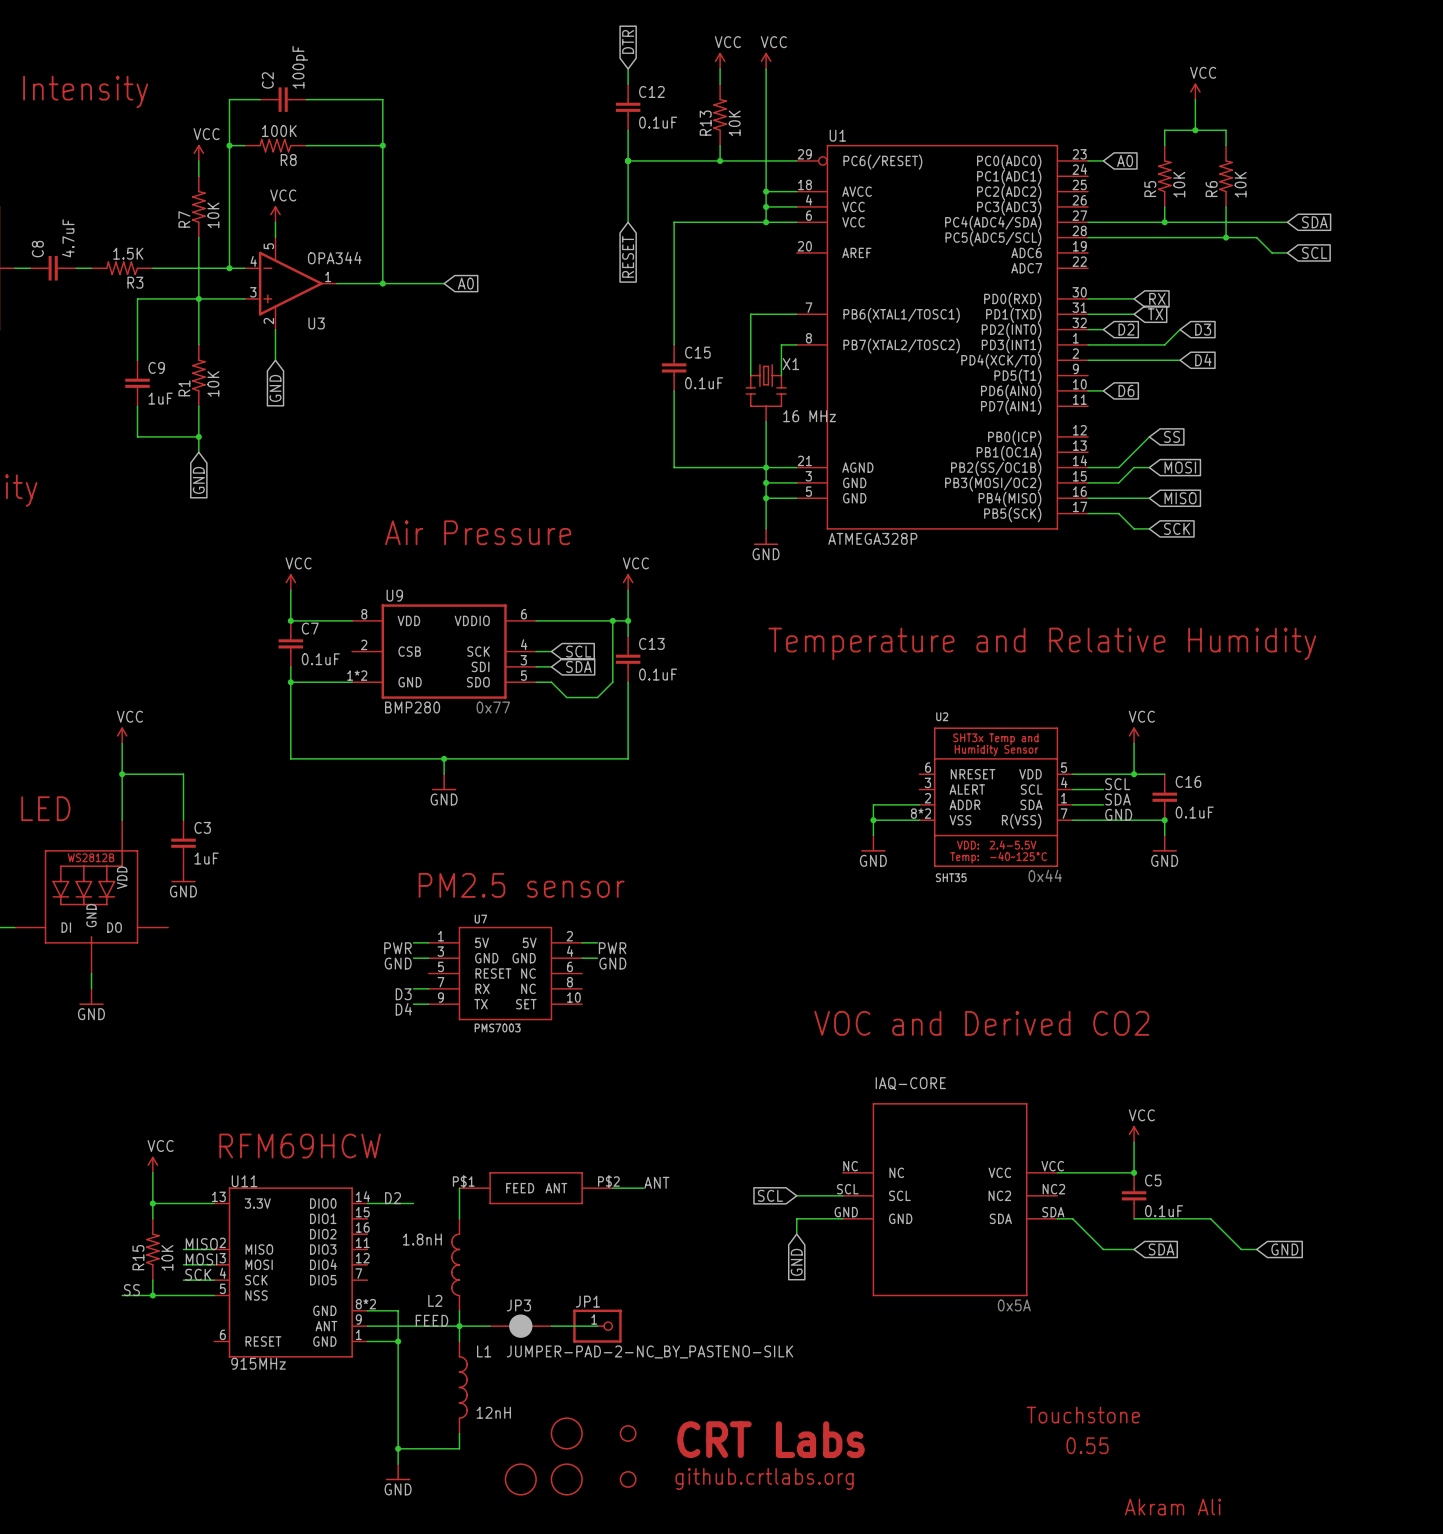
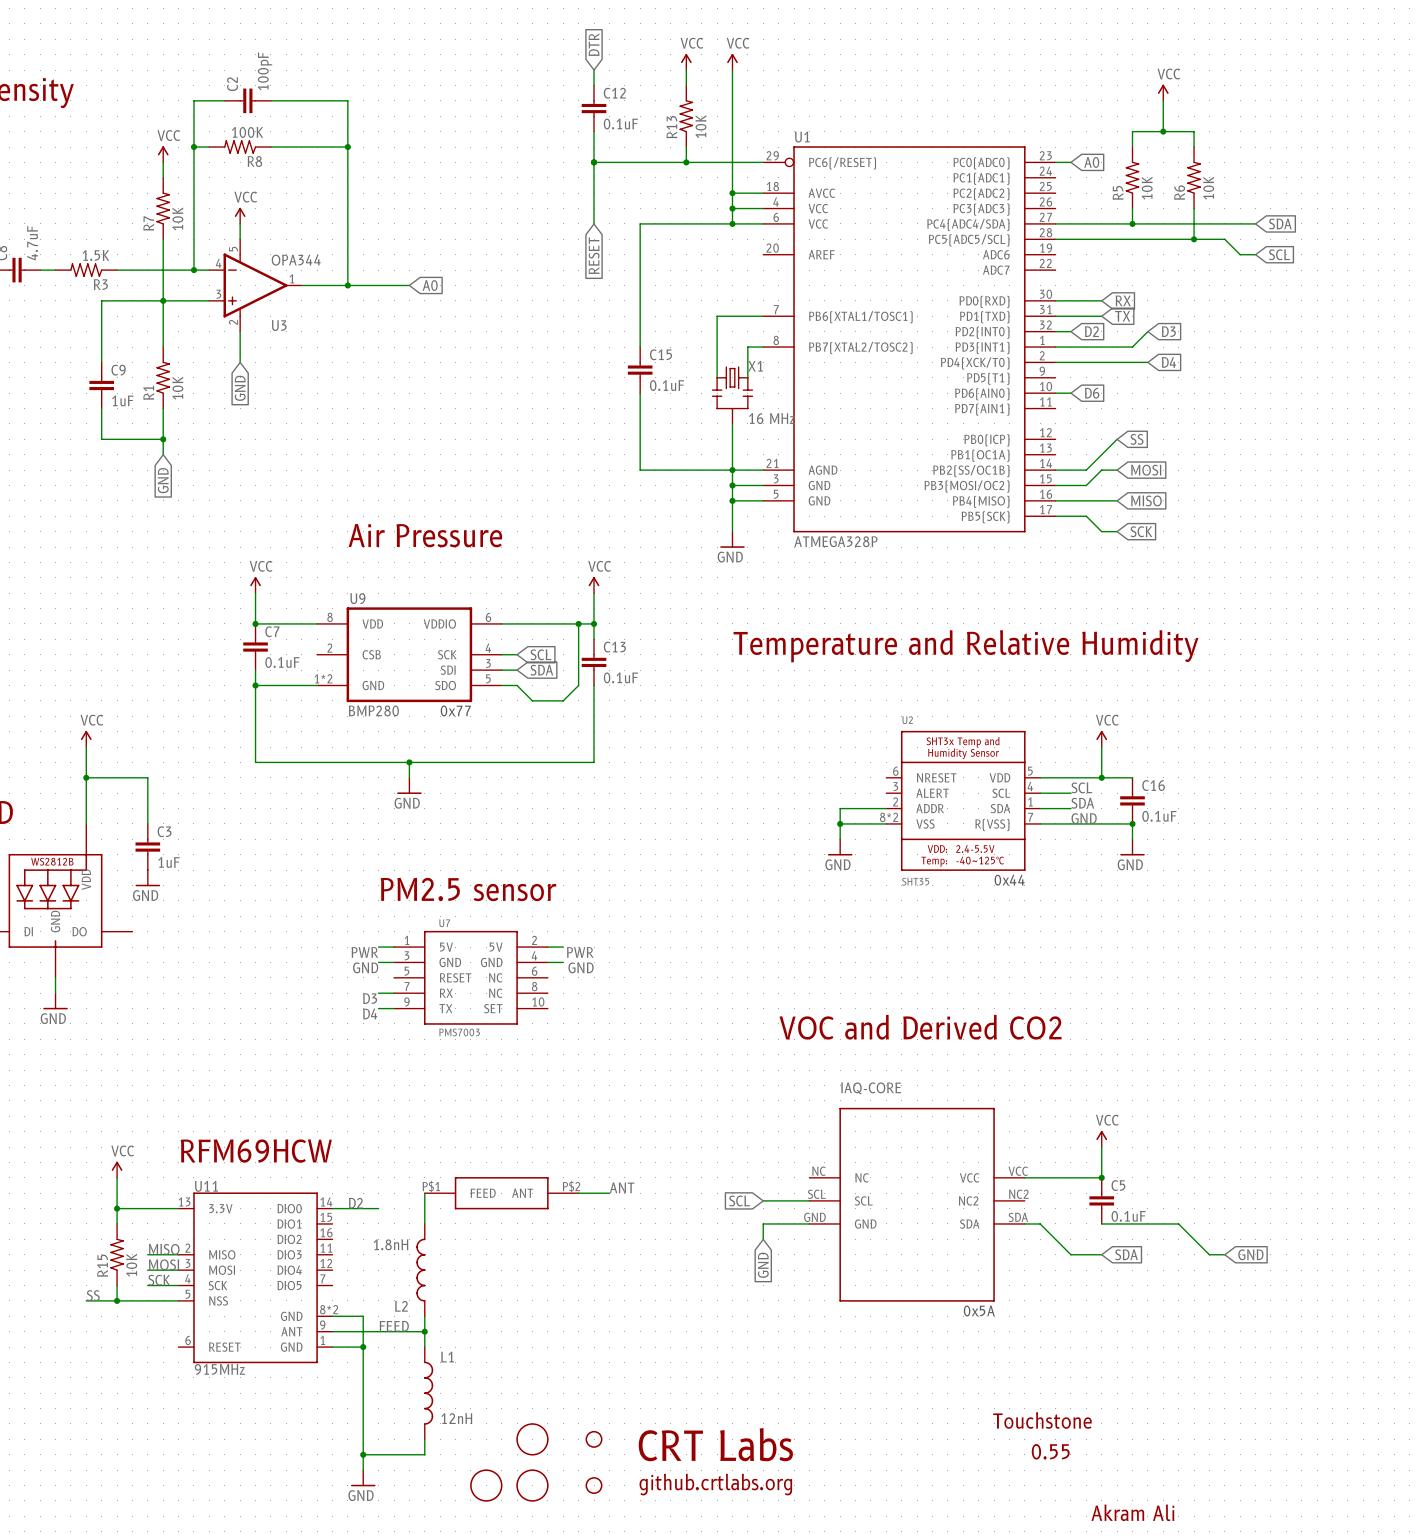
wire: (459, 1326) (490, 1326) -> none
JP3: JUMPER-PAD-2-NC_BY_PASTENO-SILK (520, 1326) -> none
wire: (551, 1326) (597, 1326) -> none
JP1: (597, 1326) -> none

